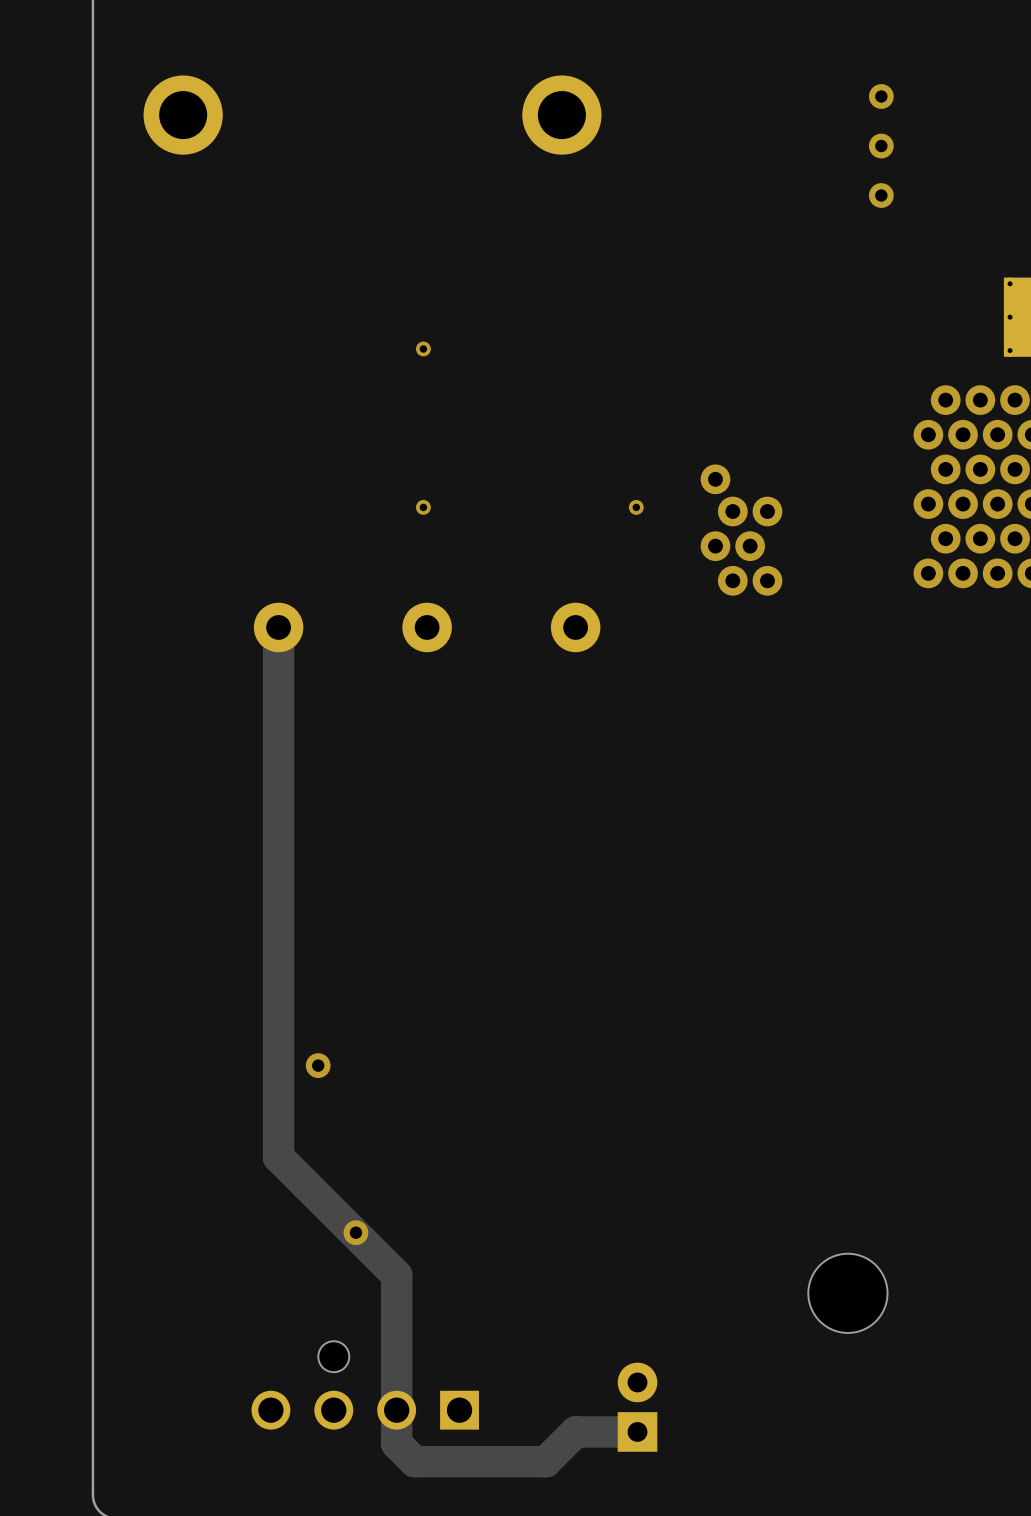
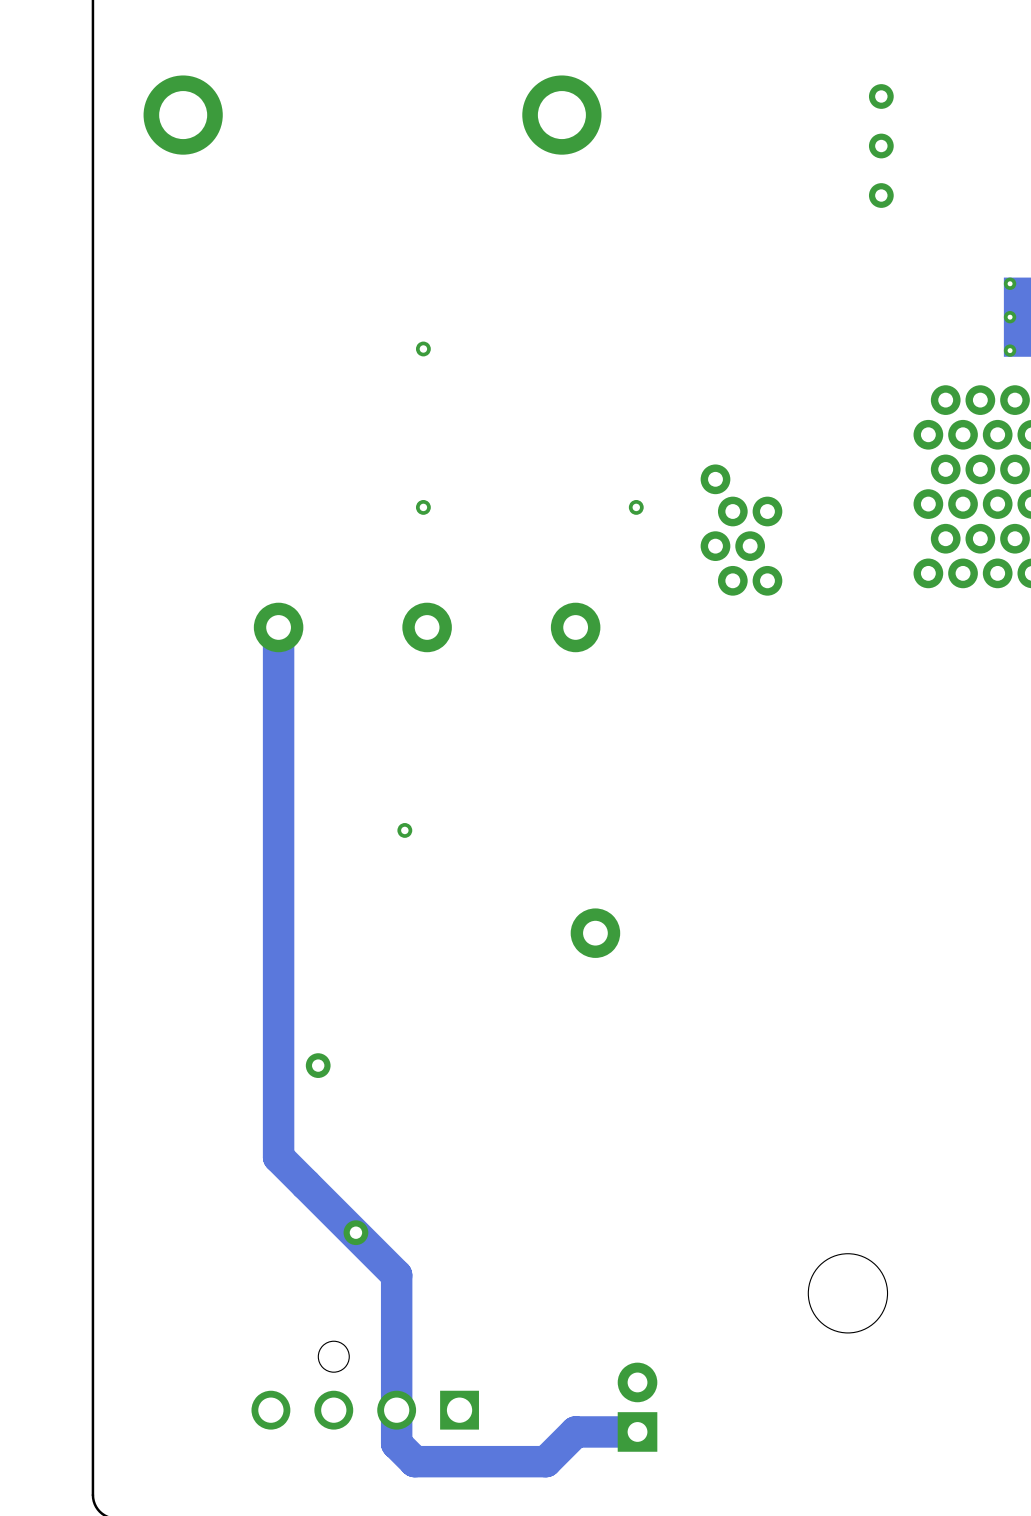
via: none -> (404, 830)
part: none -> (595, 933)

